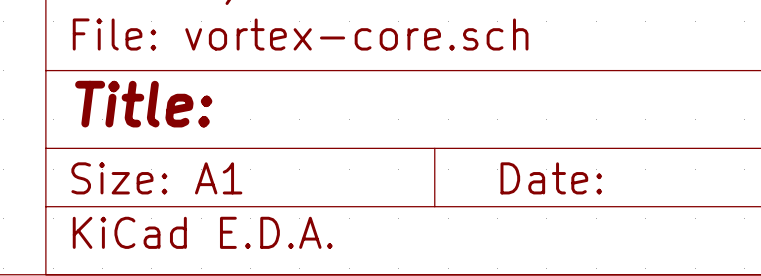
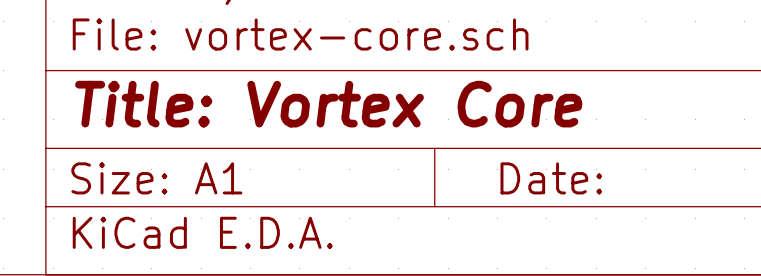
title block: Title: (143, 104) -> Title: Vortex Core (328, 104)

